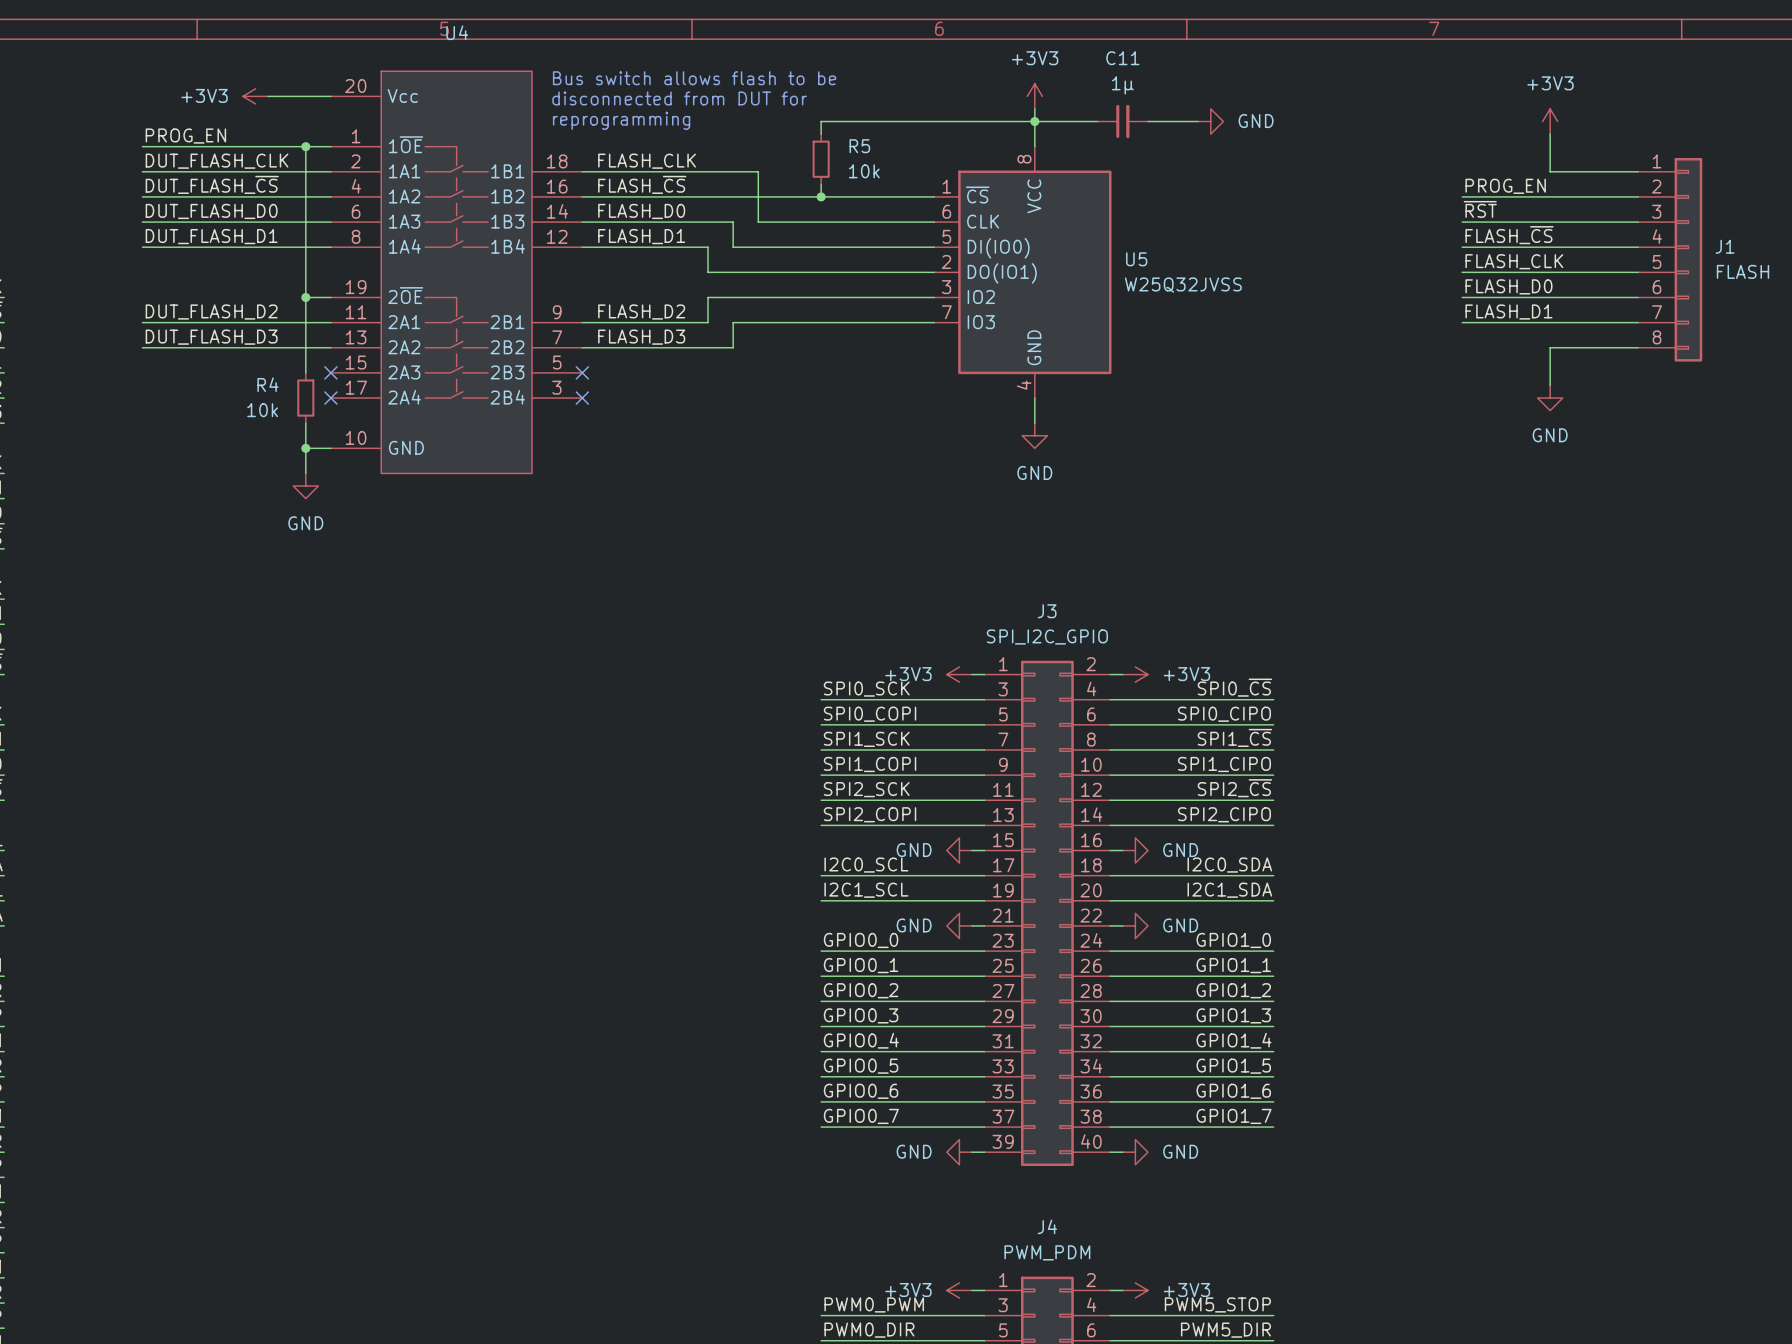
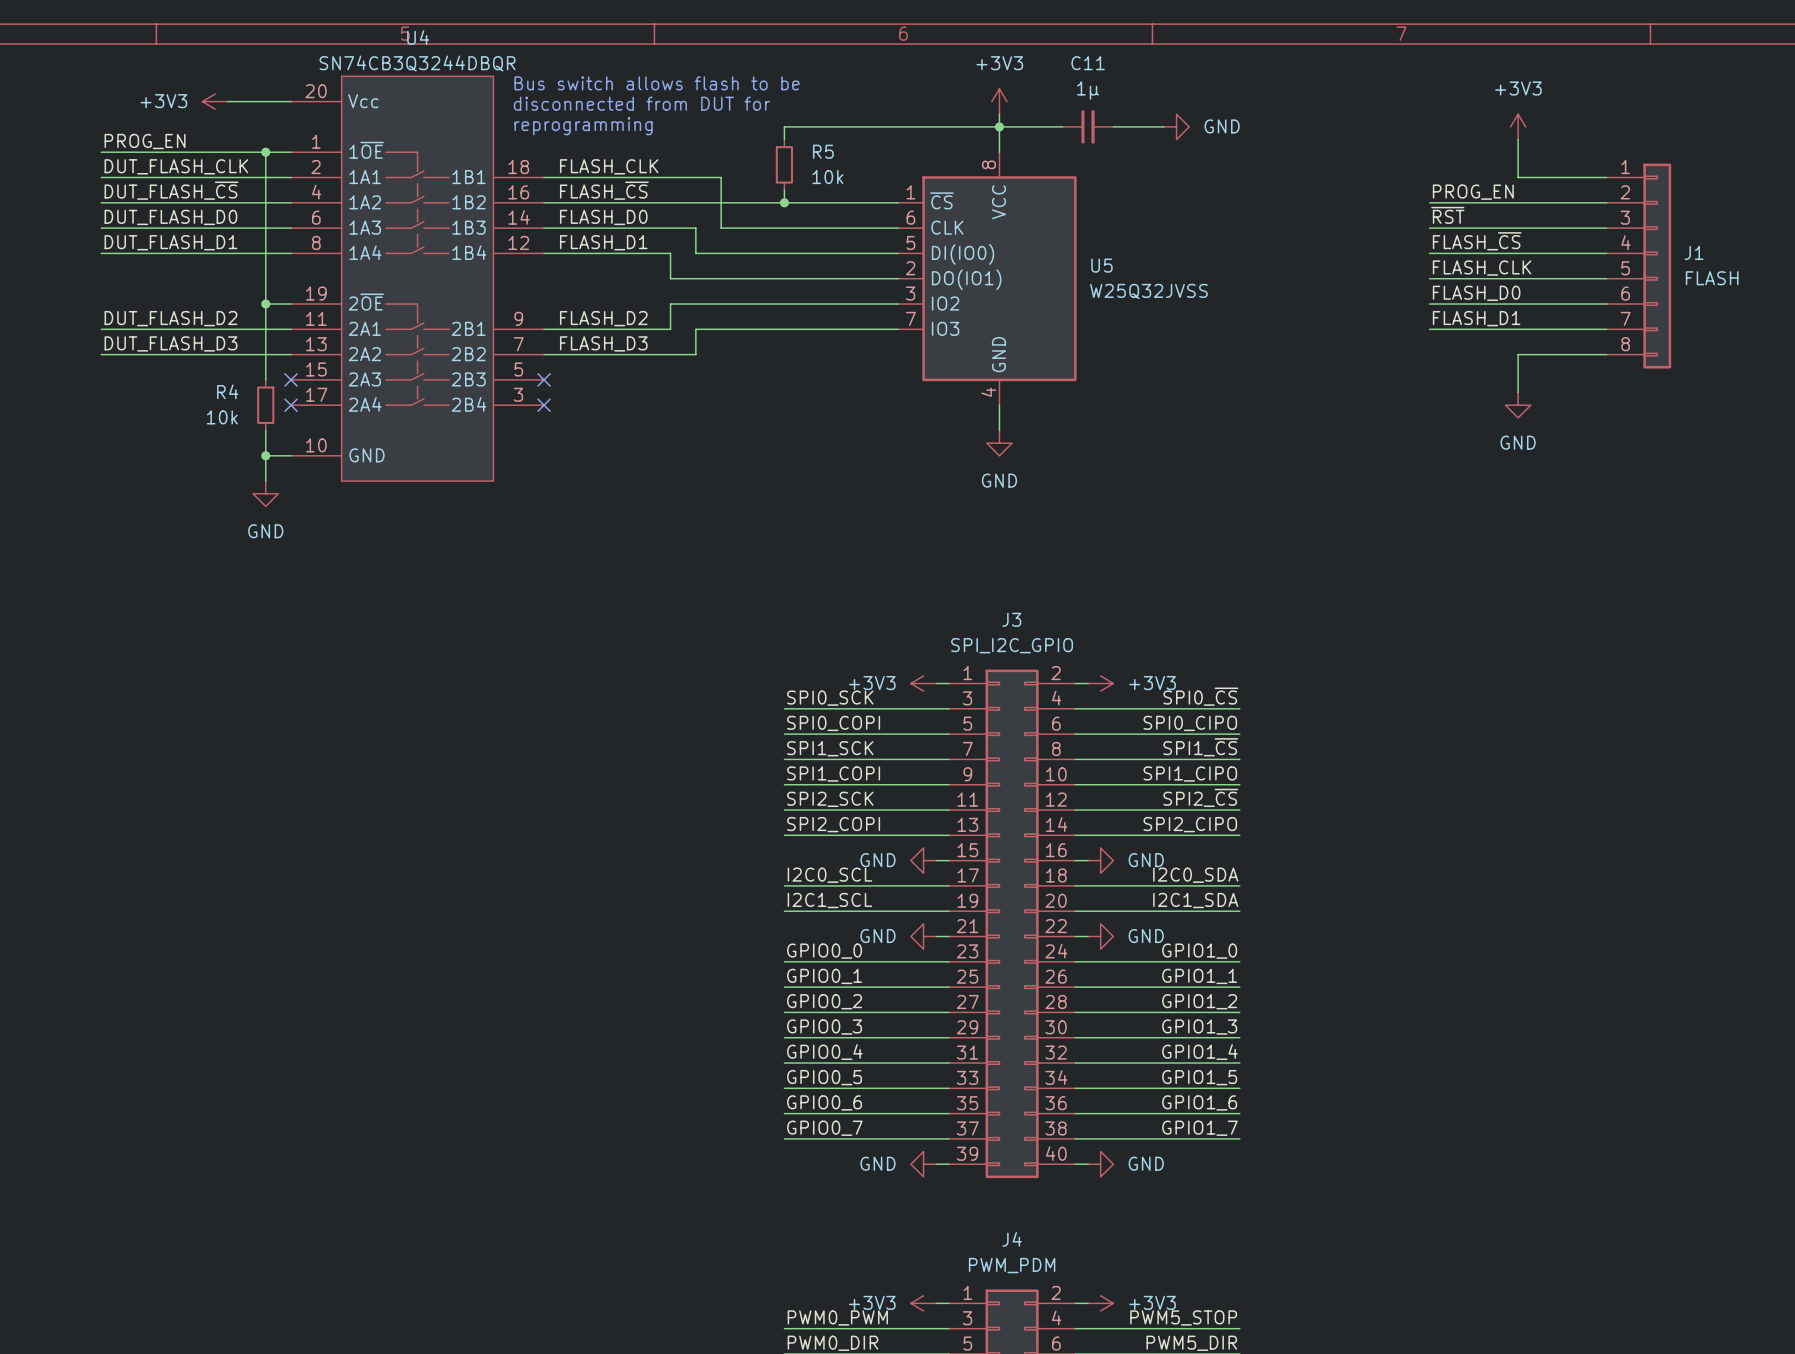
U4 value: none -> SN74CB3Q3244DBQR (417, 63)

